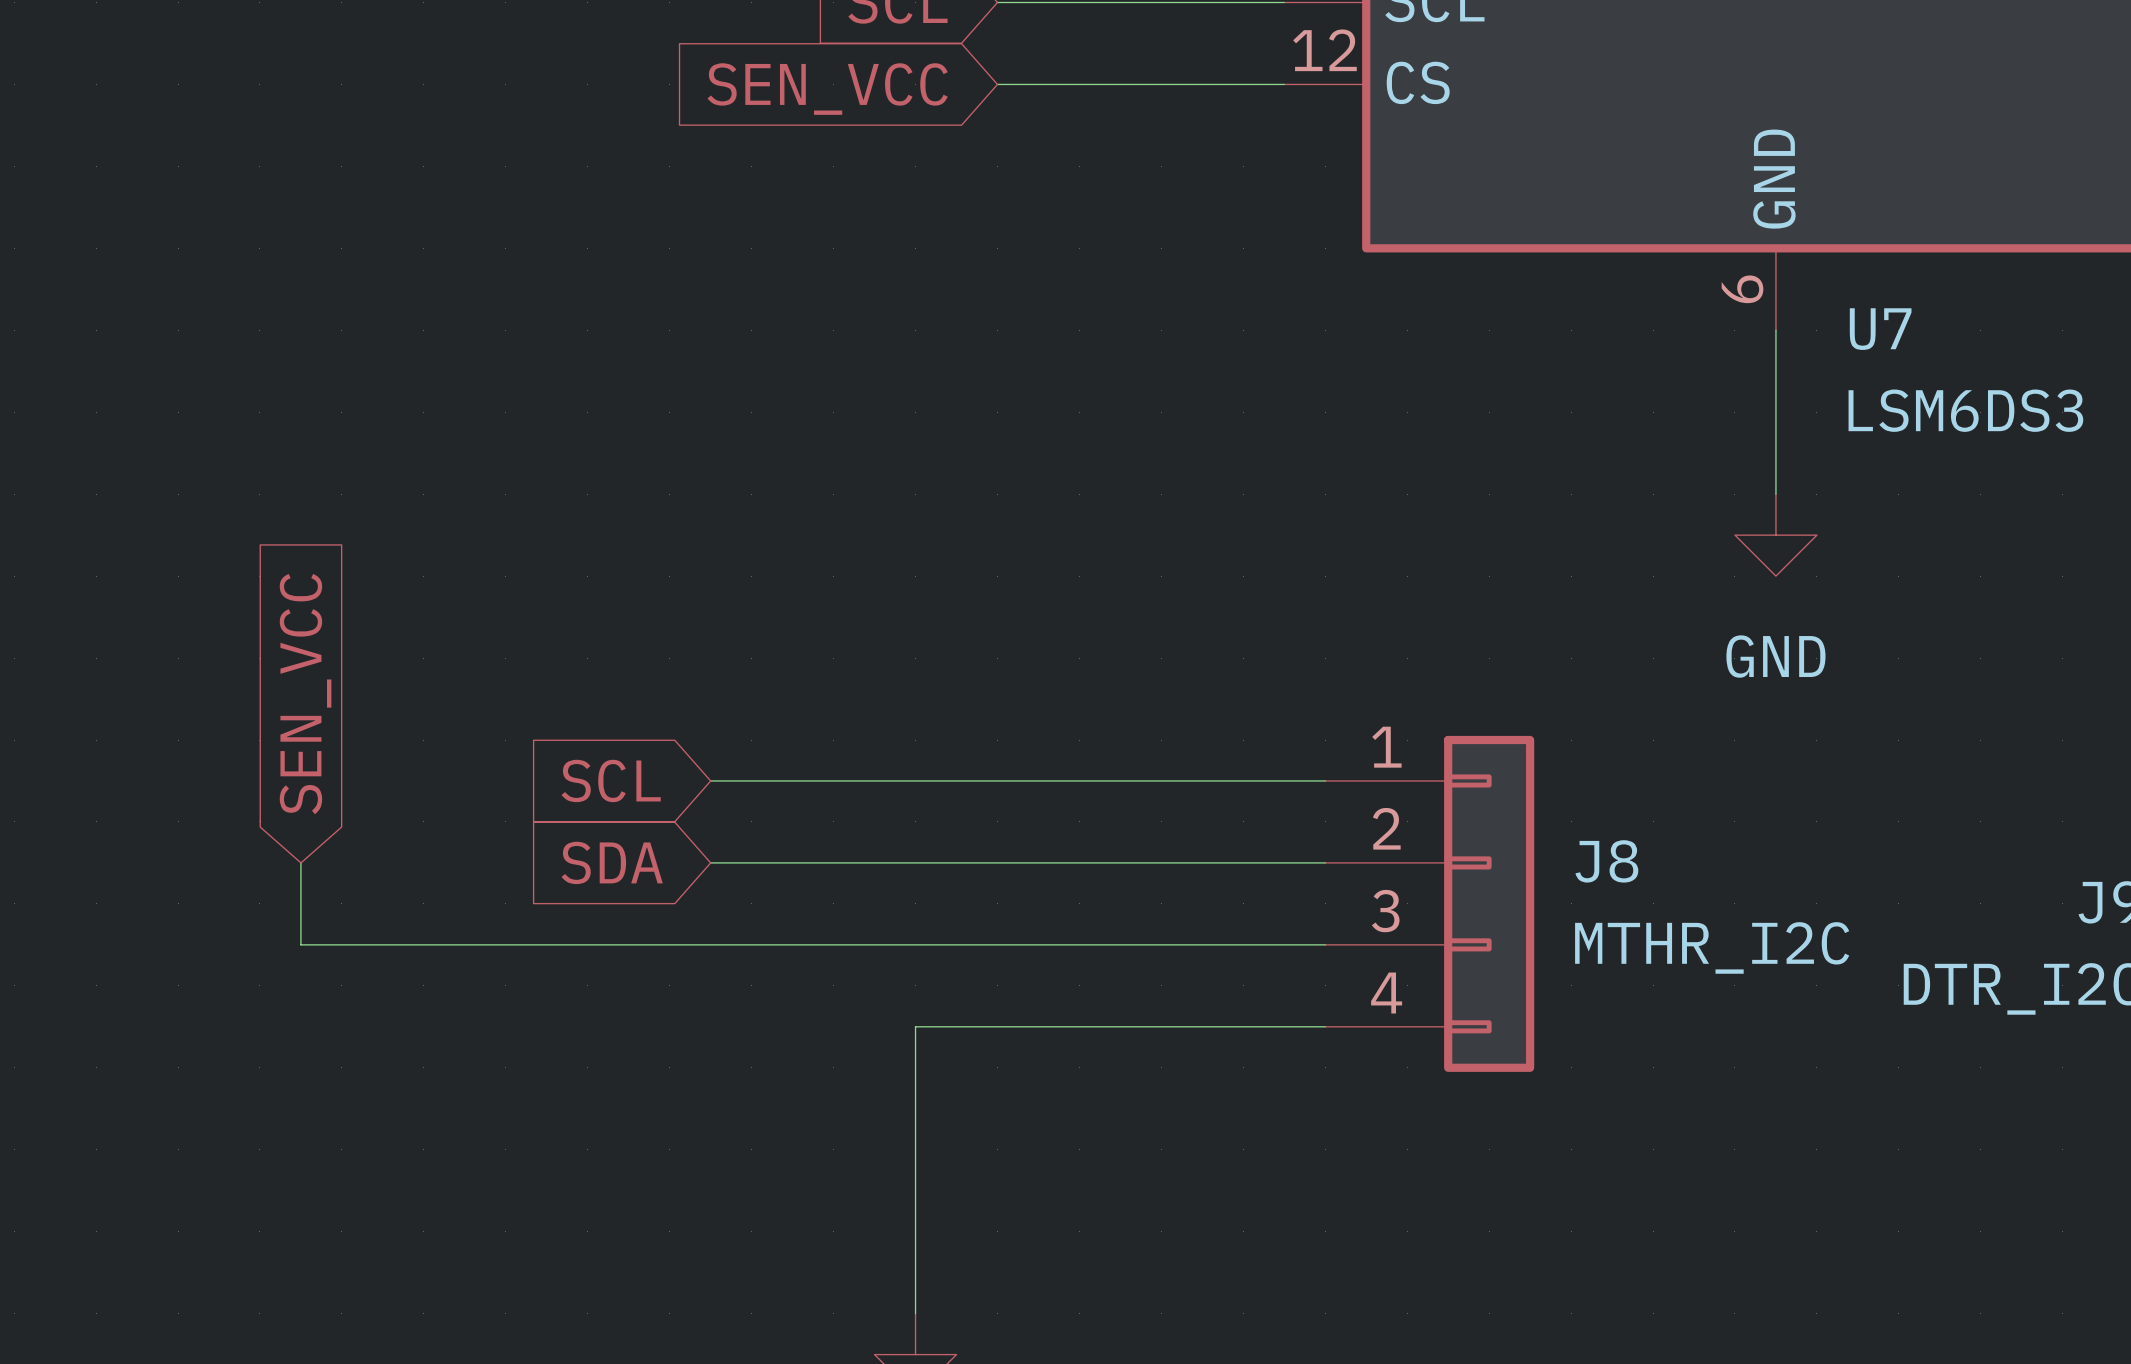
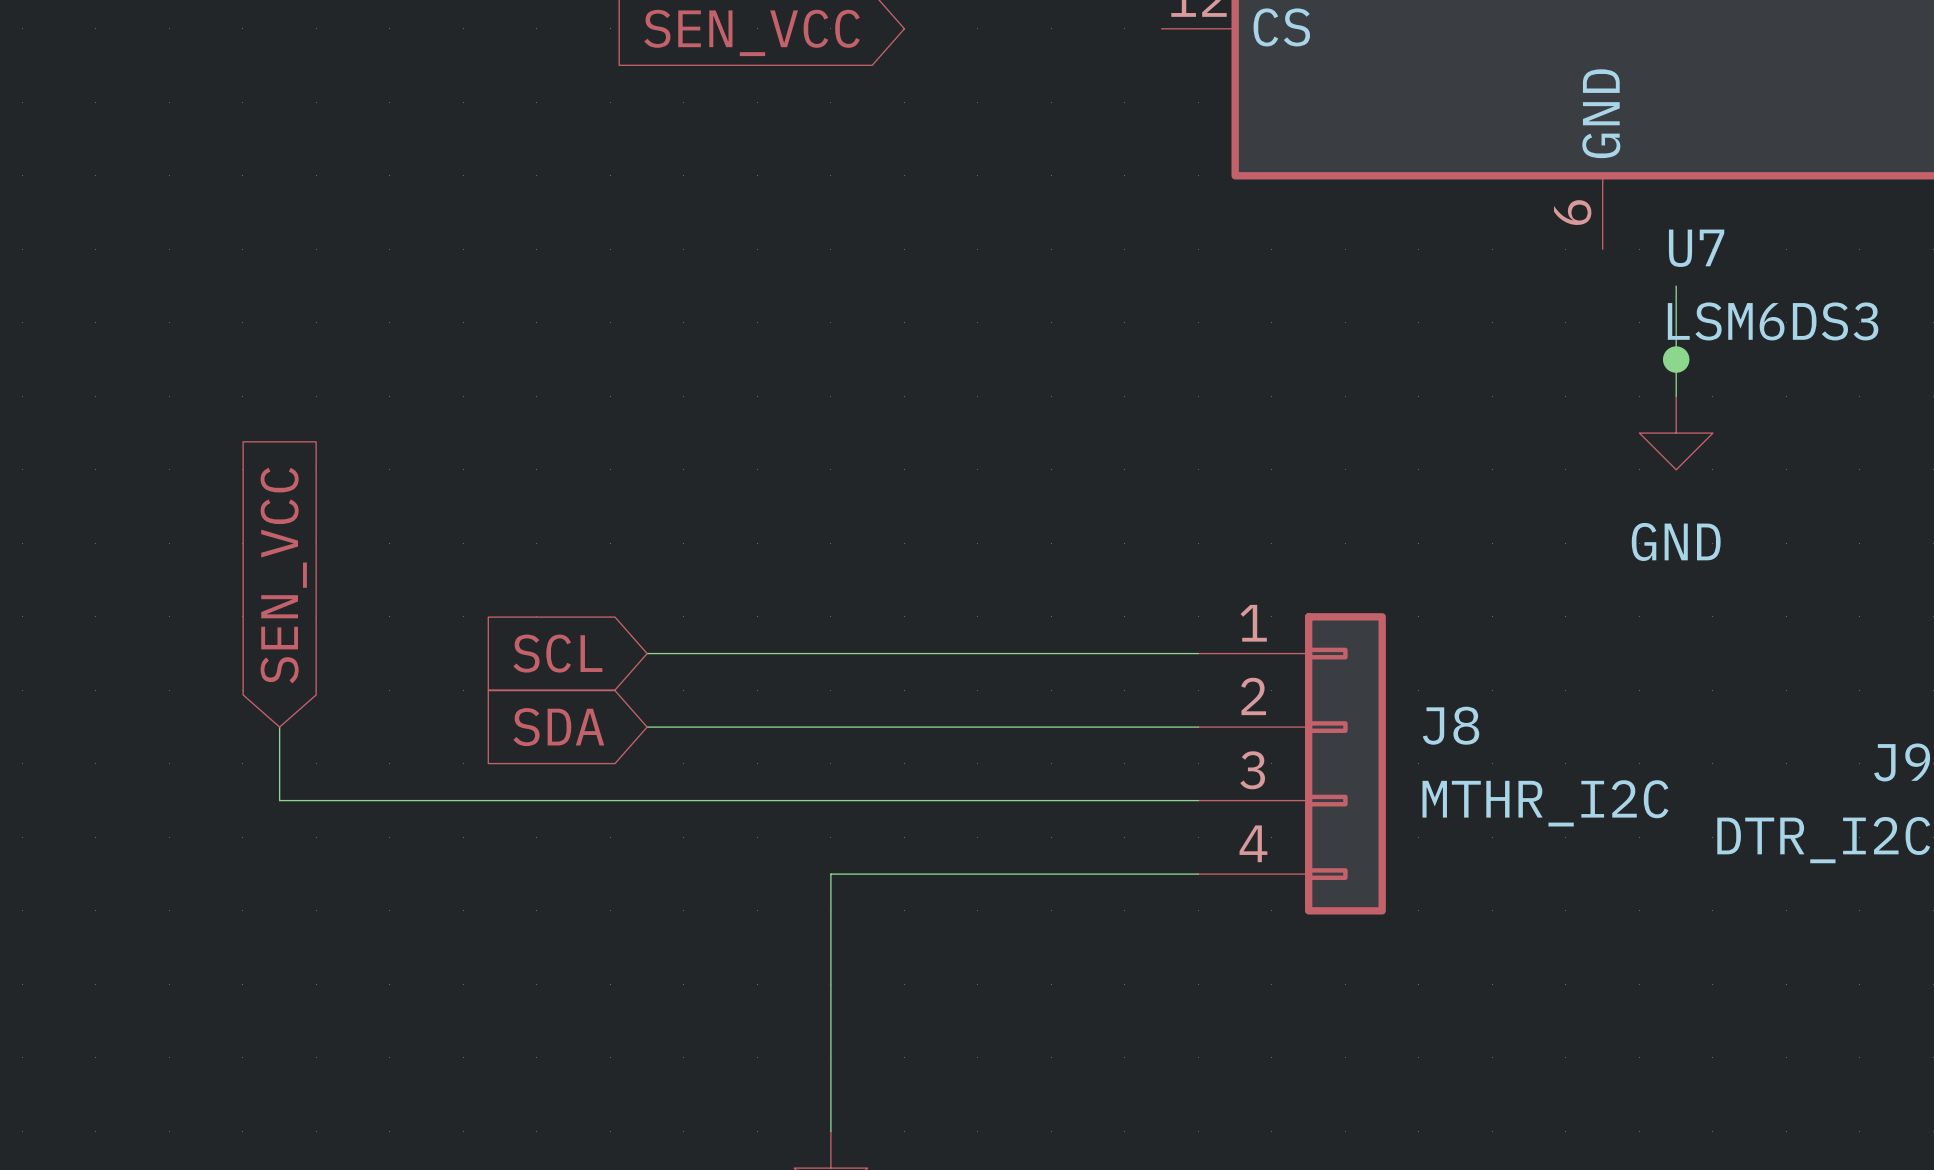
wire: (997, 84) (1284, 84) -> none
wire: (1775, 330) (1775, 494) -> none
wire: none -> (1676, 286) (1676, 396)
junction: none -> (1676, 359)
power symbol position: GND (1775, 535) -> GND (1676, 433)

